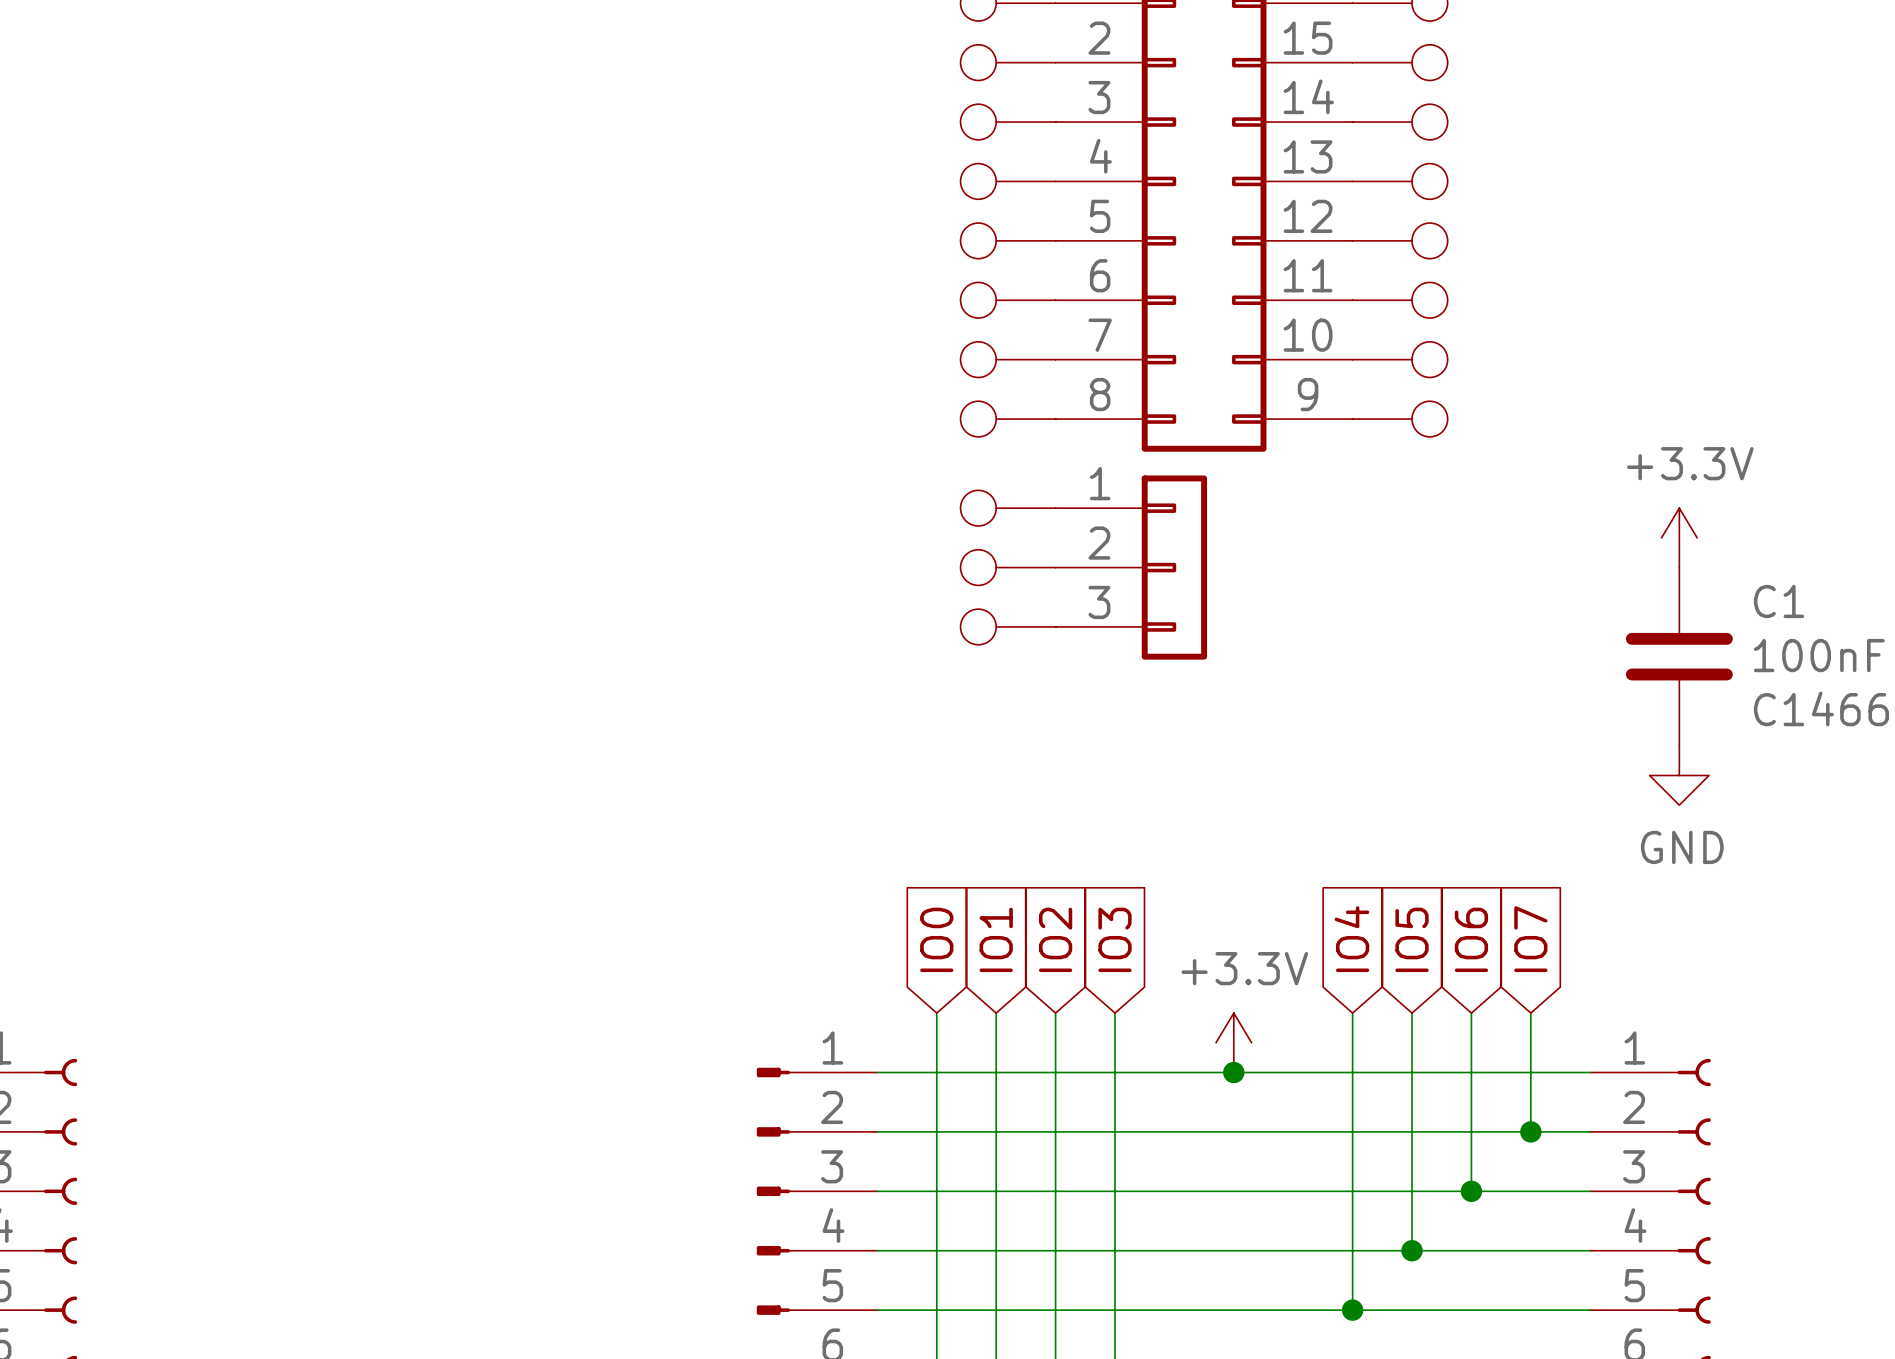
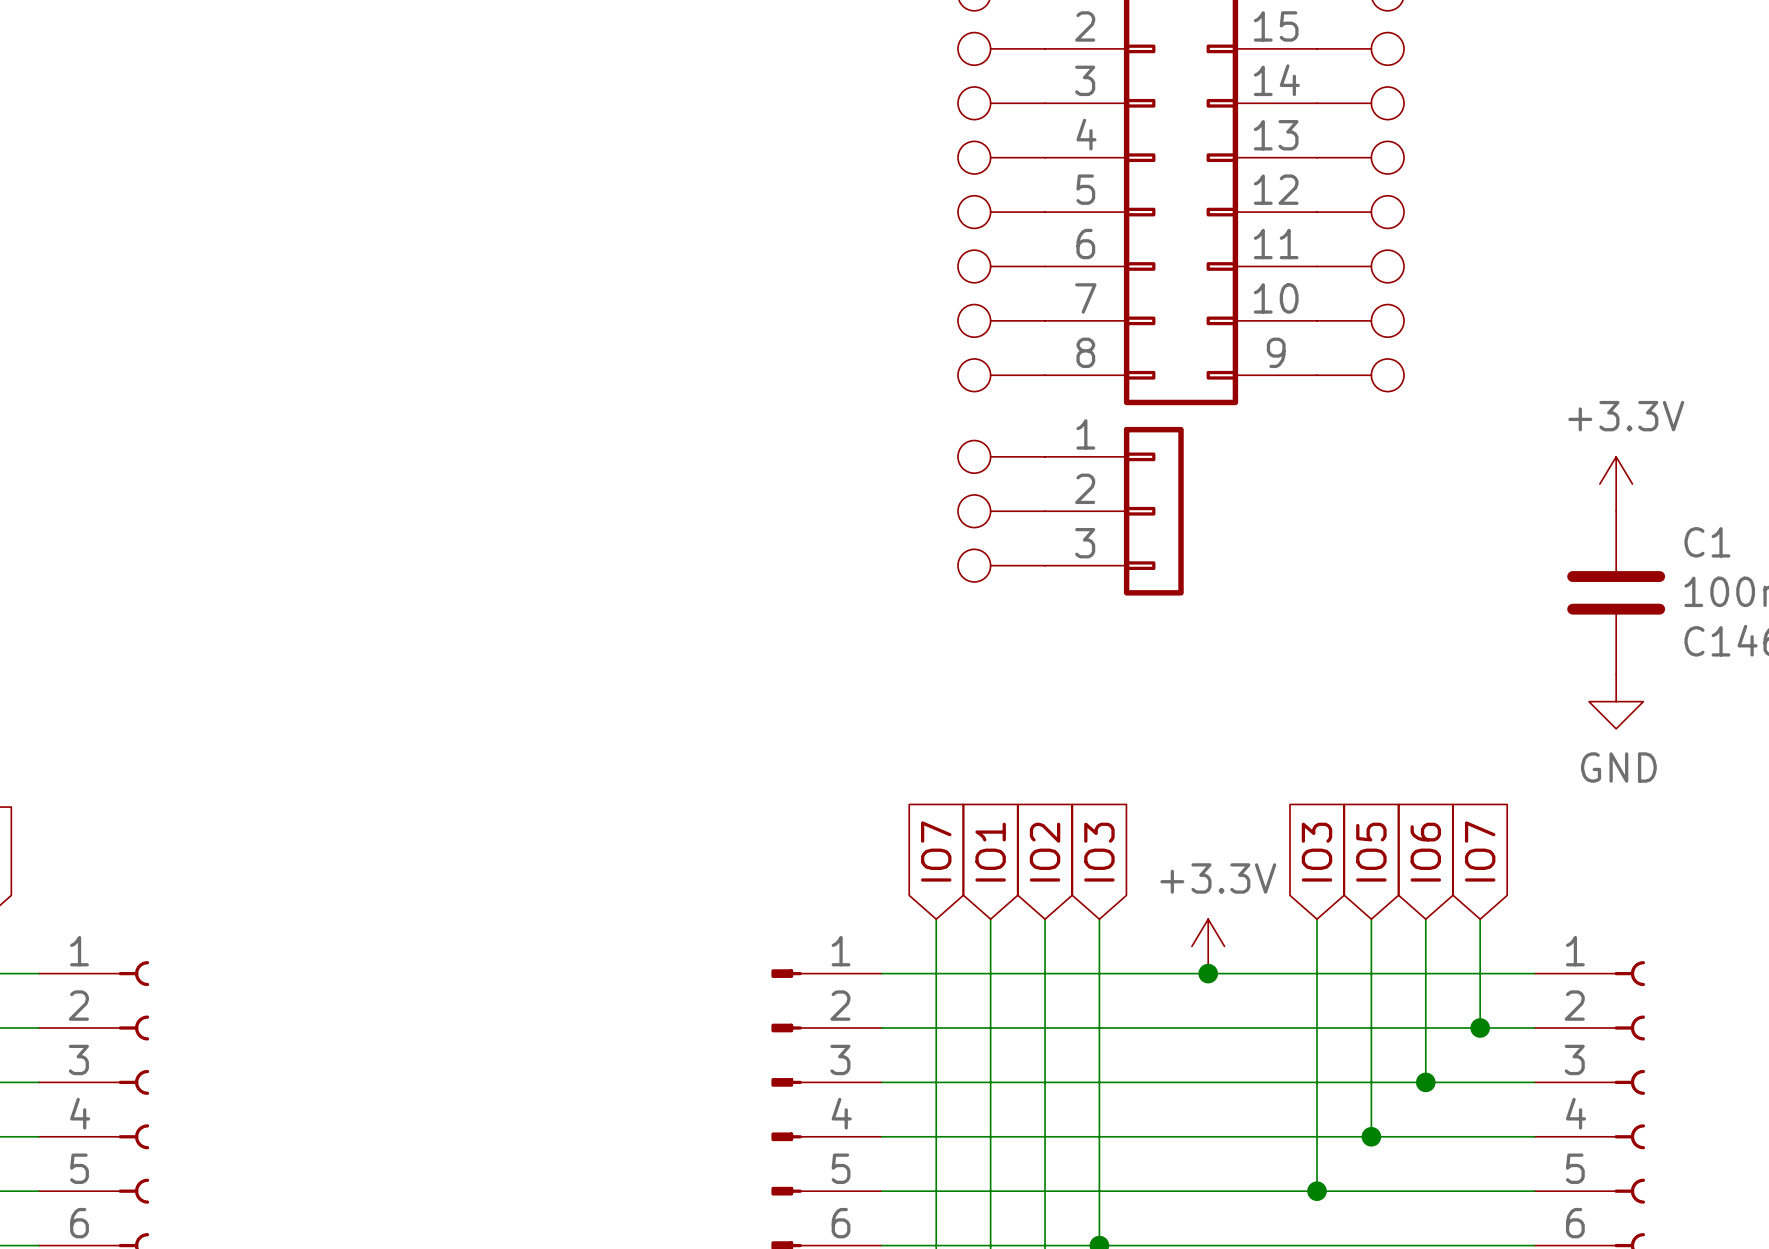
global label: IO0 (936, 939) -> IO7 (936, 851)
global label: IO4 (1351, 939) -> IO3 (1317, 852)

